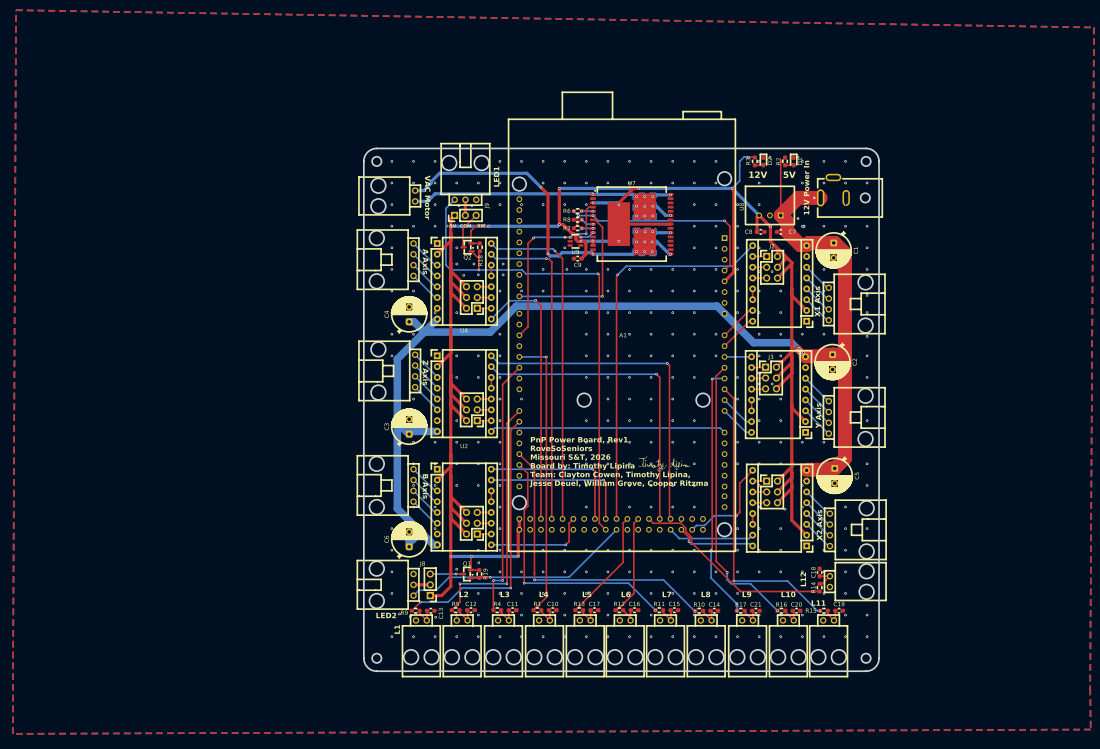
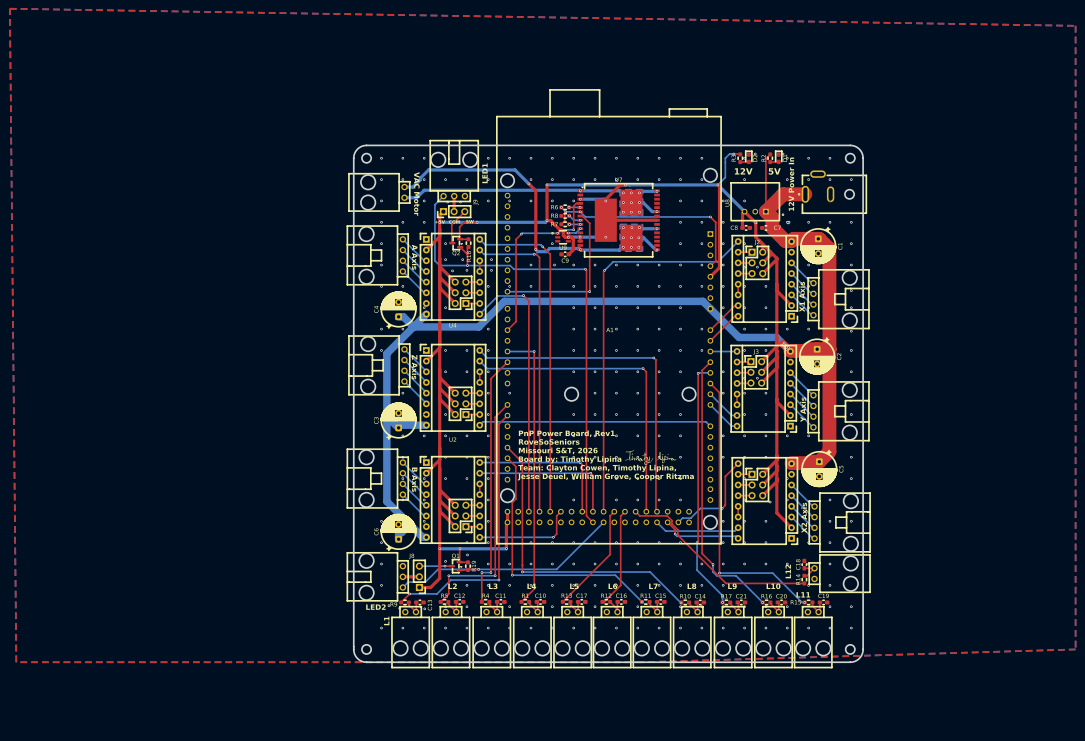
top zone outline: (16, 10) (12, 733) (1090, 729) (1093, 27) -> (9, 8) (16, 662) (642, 662) (1075, 649) (1075, 25)

